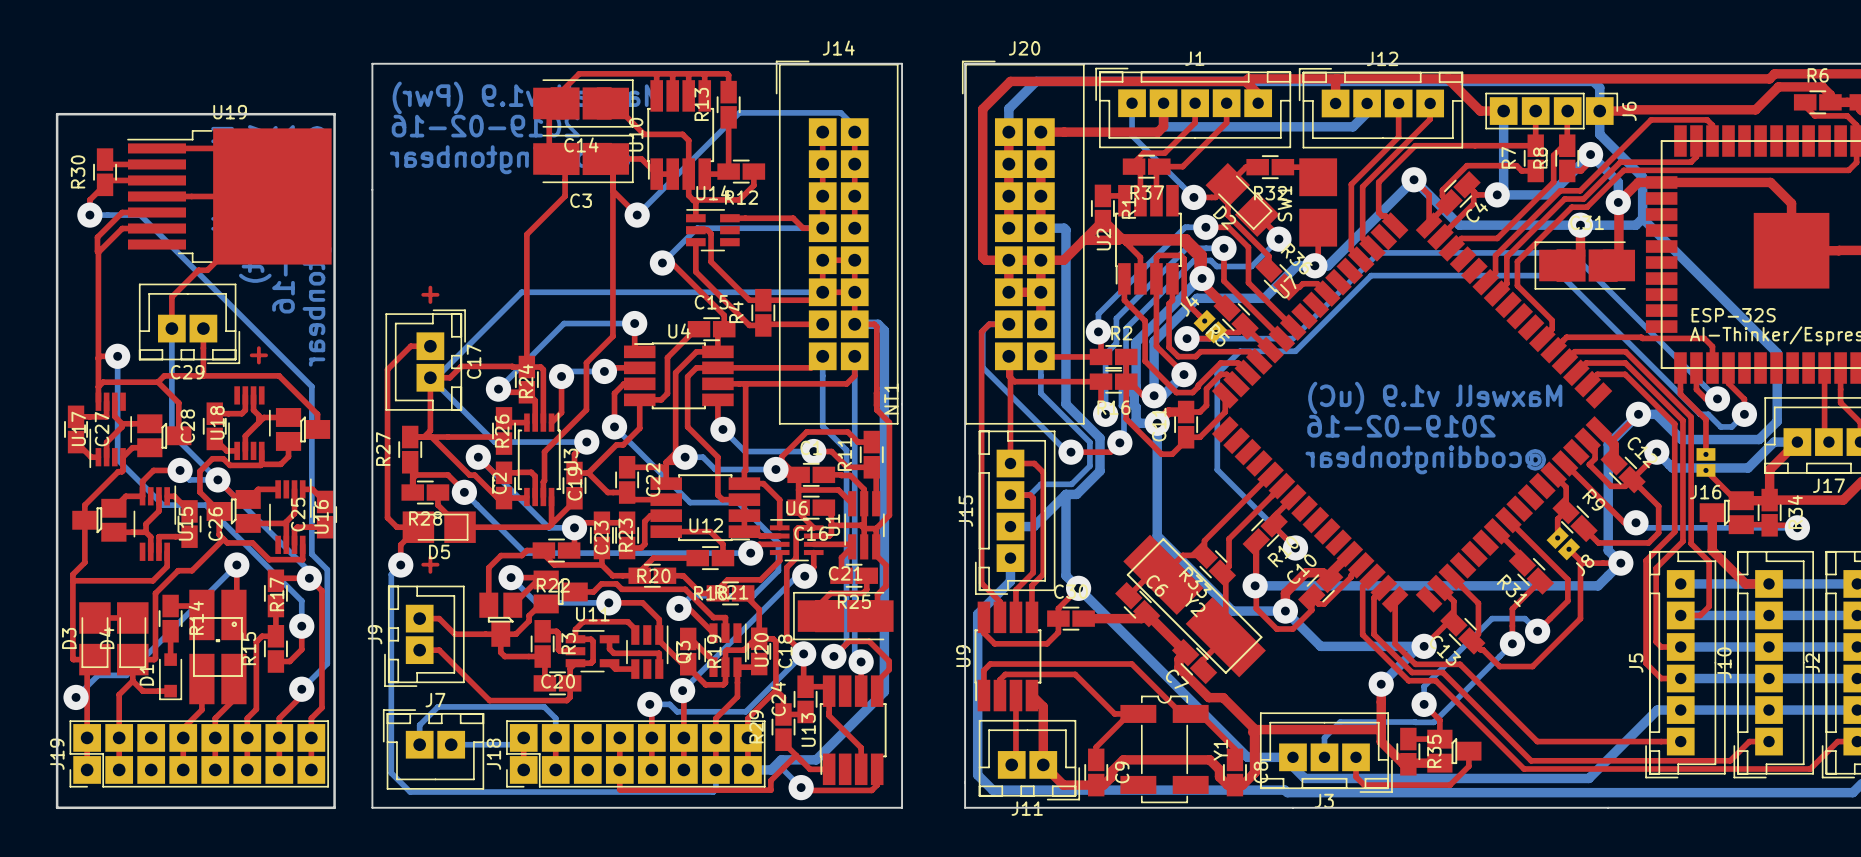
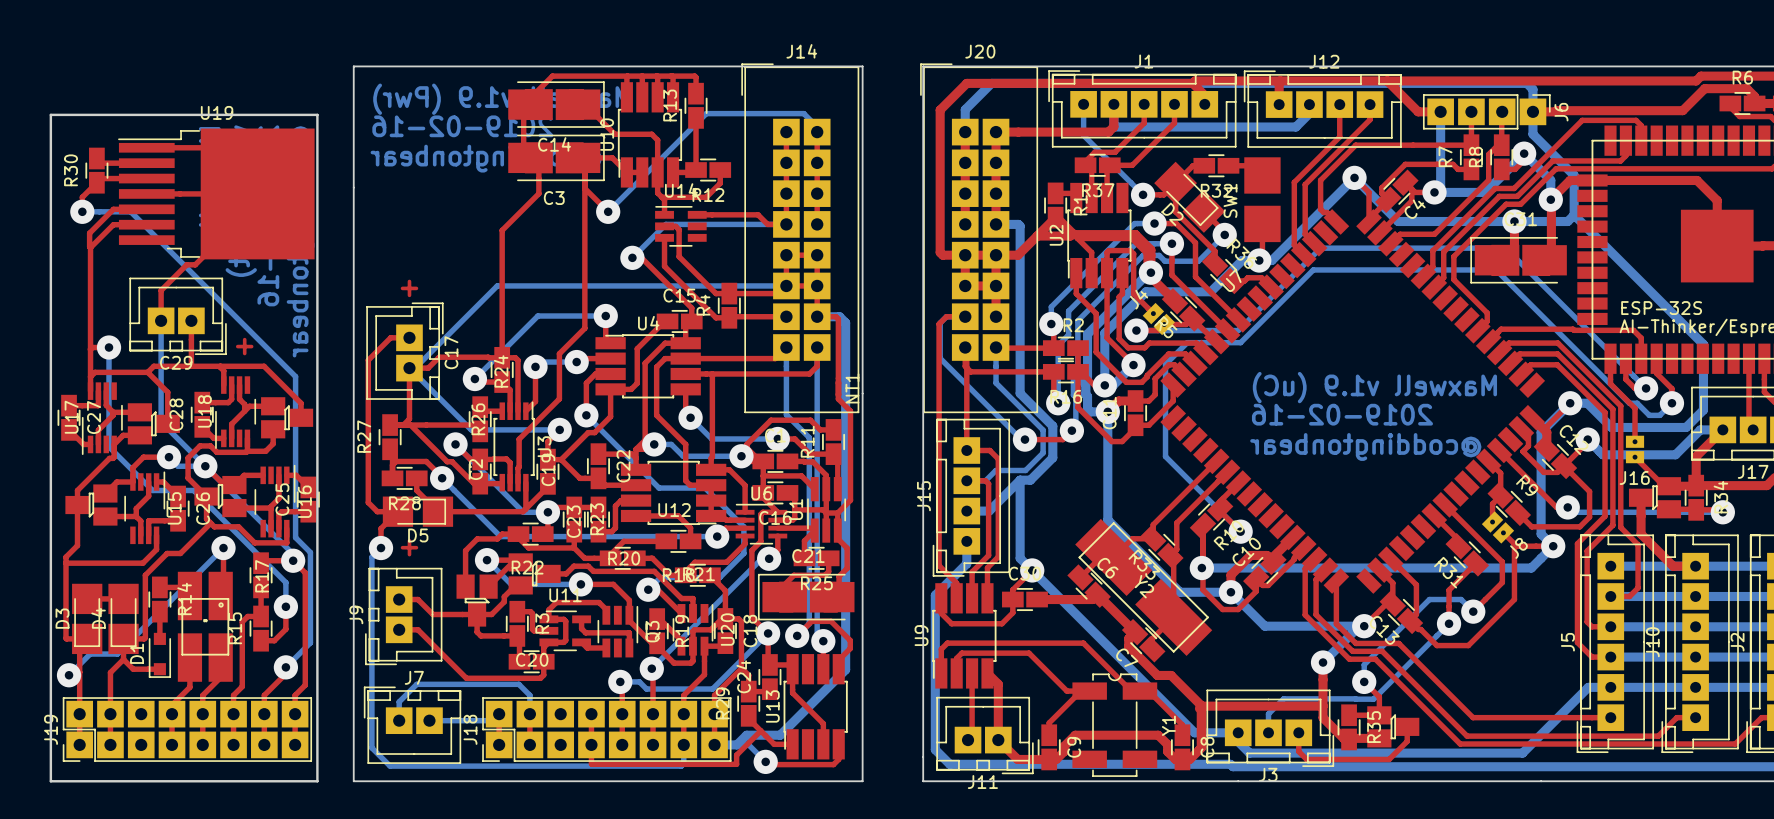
top track: none -> (220, 366) (223, 370) (223, 385)

